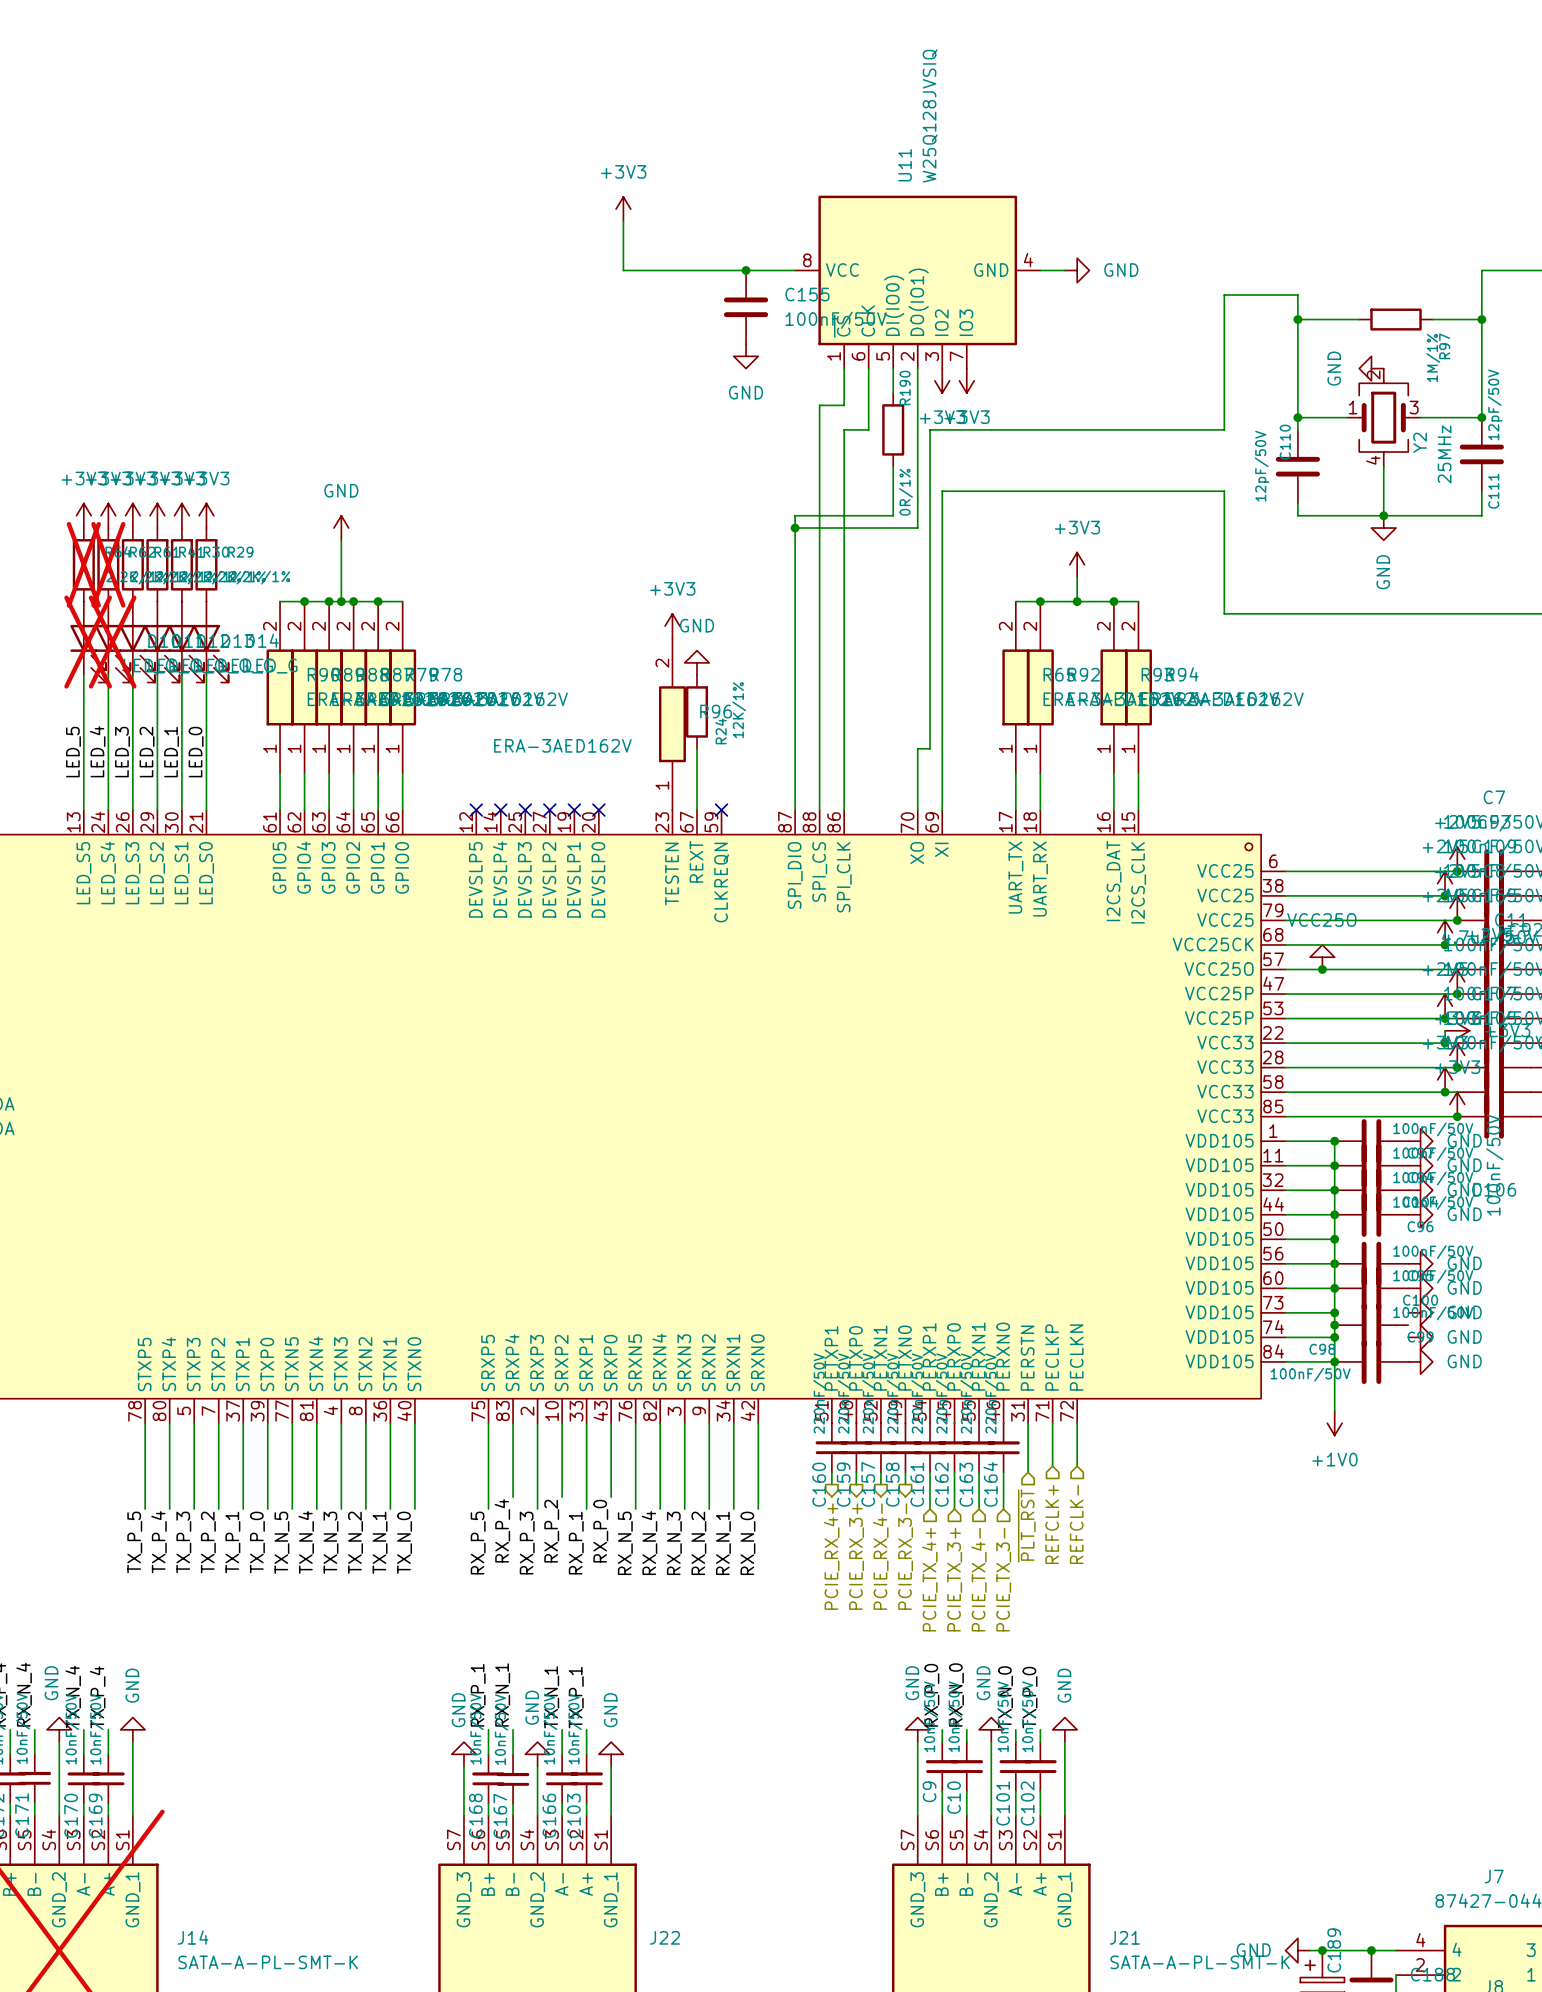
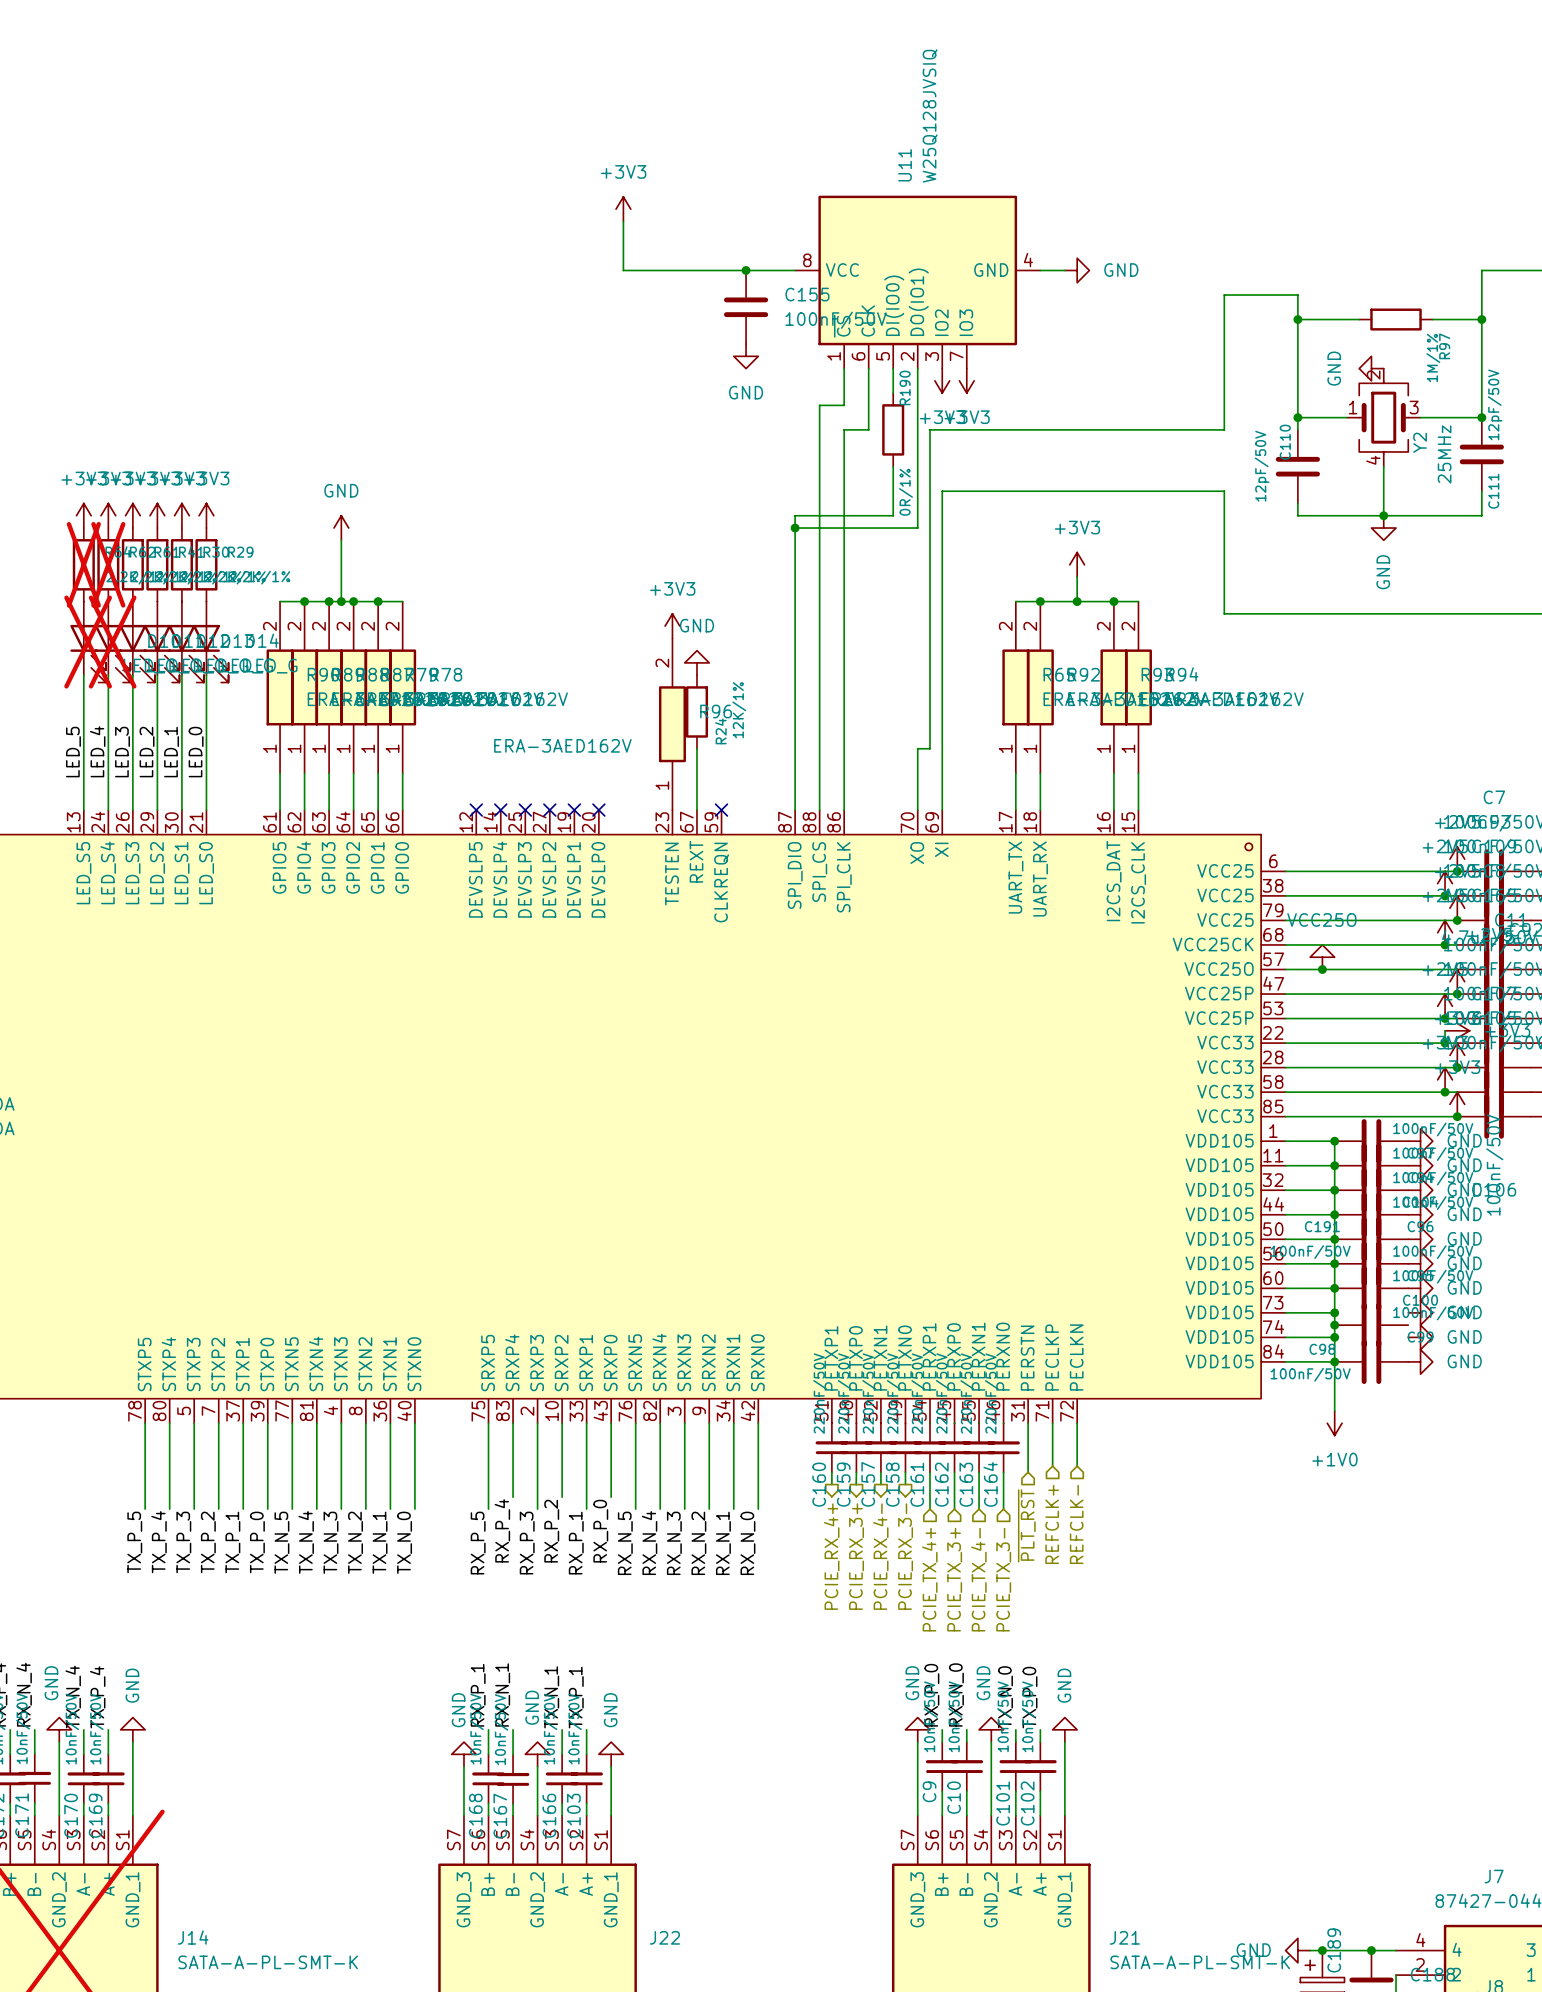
C191: none -> 100nF/50V (1371, 1239)
power symbol: none -> GND (1420, 1239)

